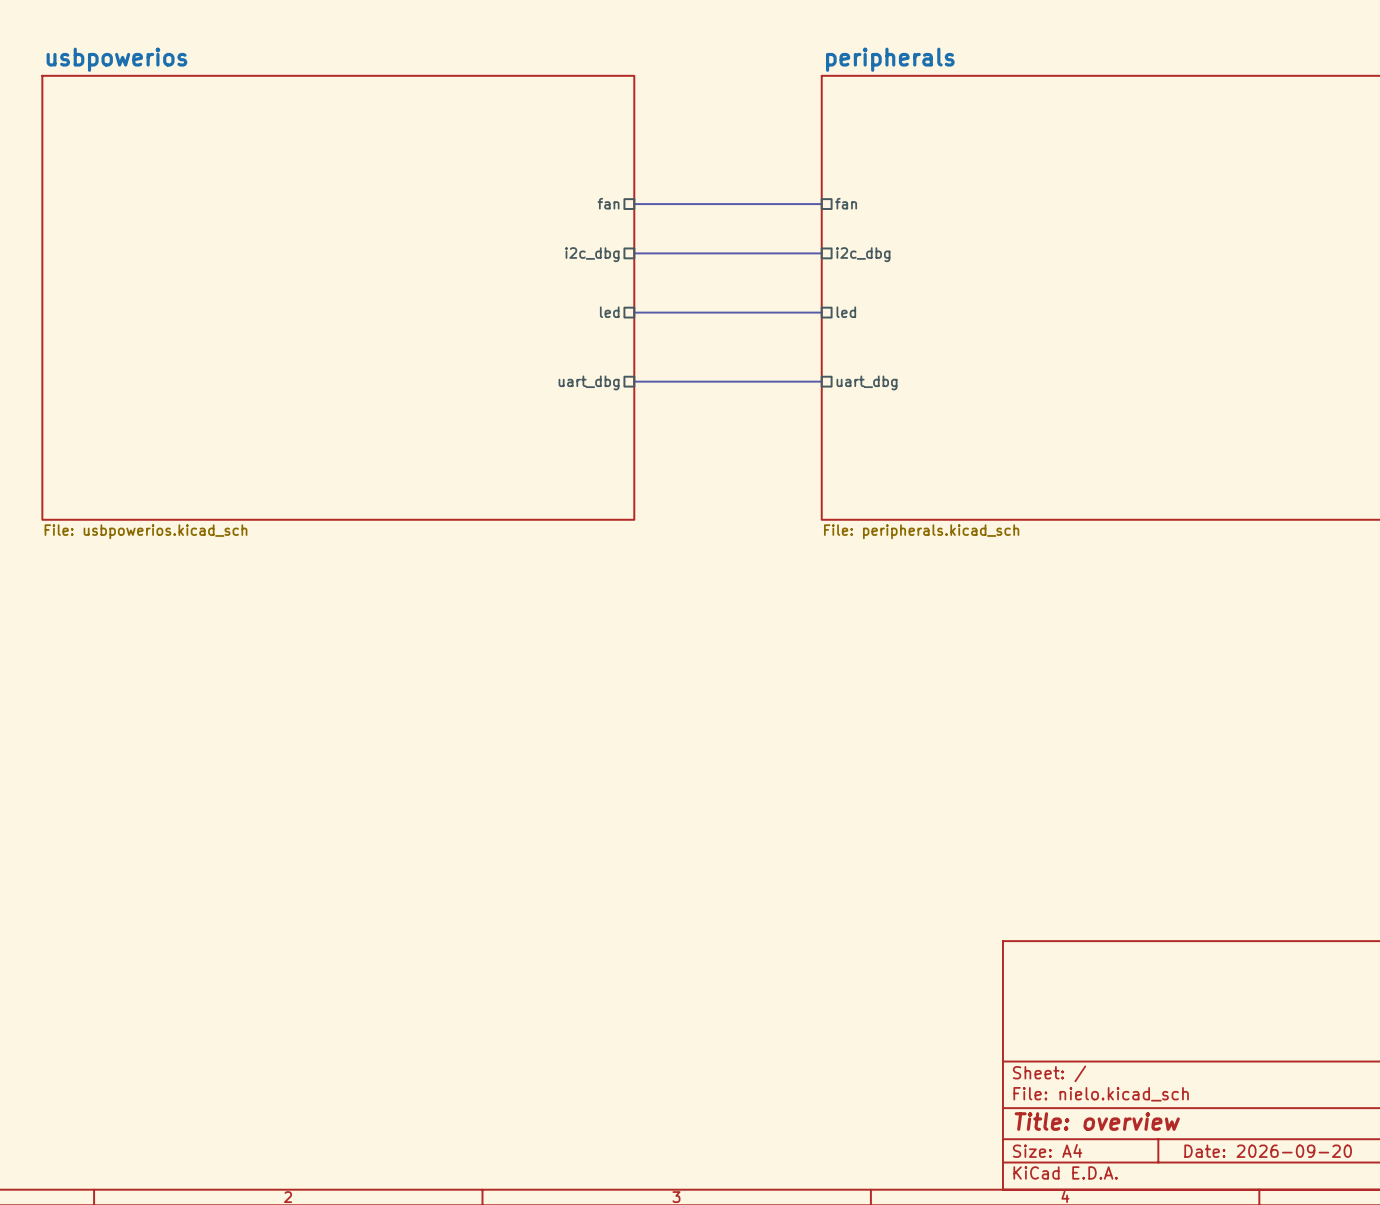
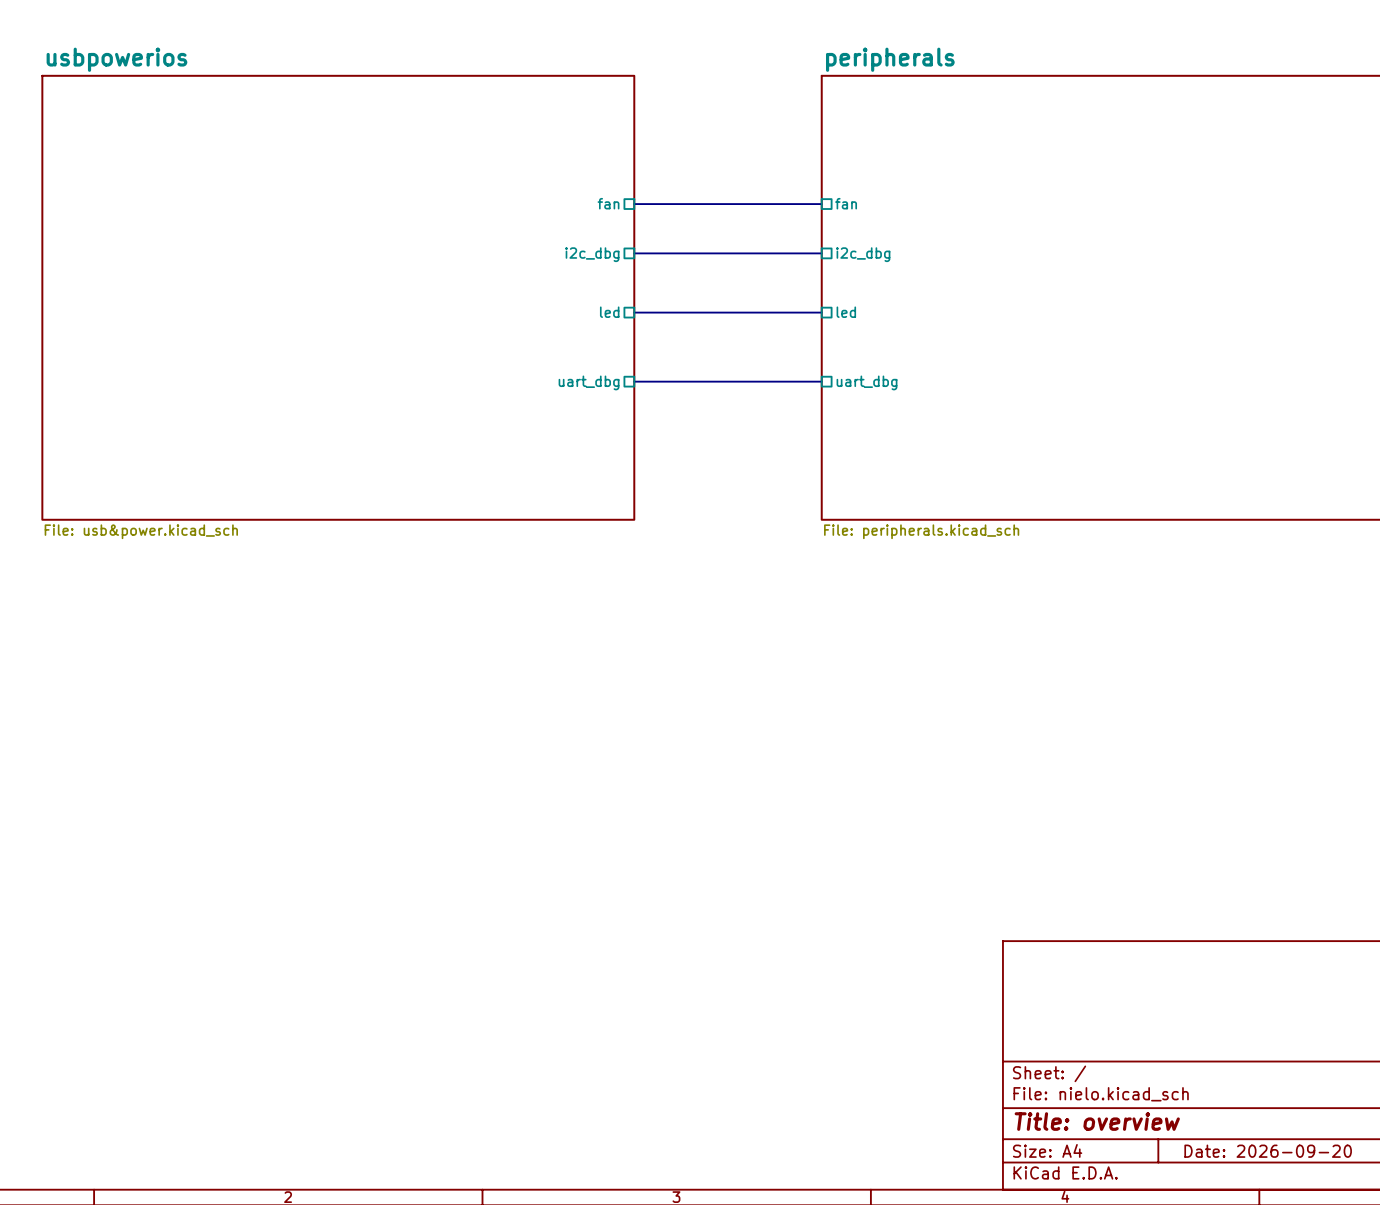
sheet usbpowerios value: File: usbpowerios.kicad_sch (146, 531) -> File: usb&power.kicad_sch (141, 531)

